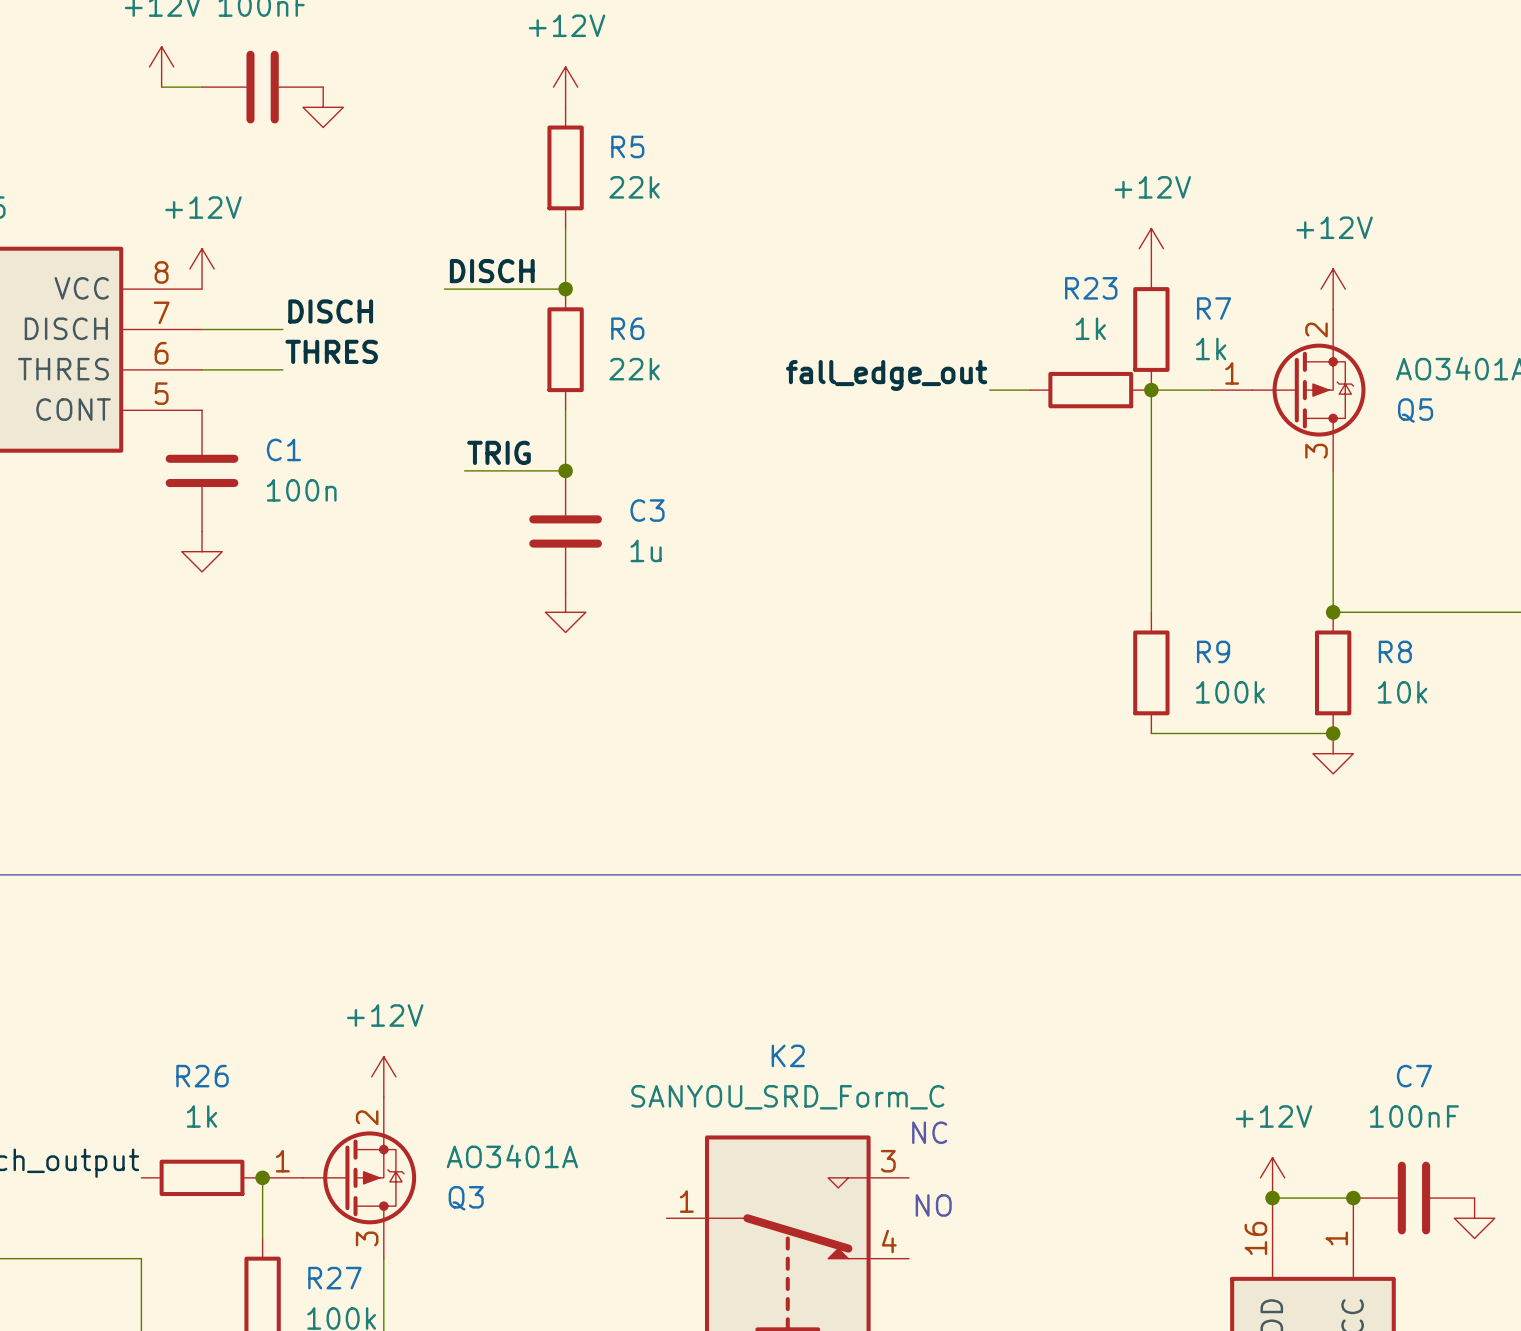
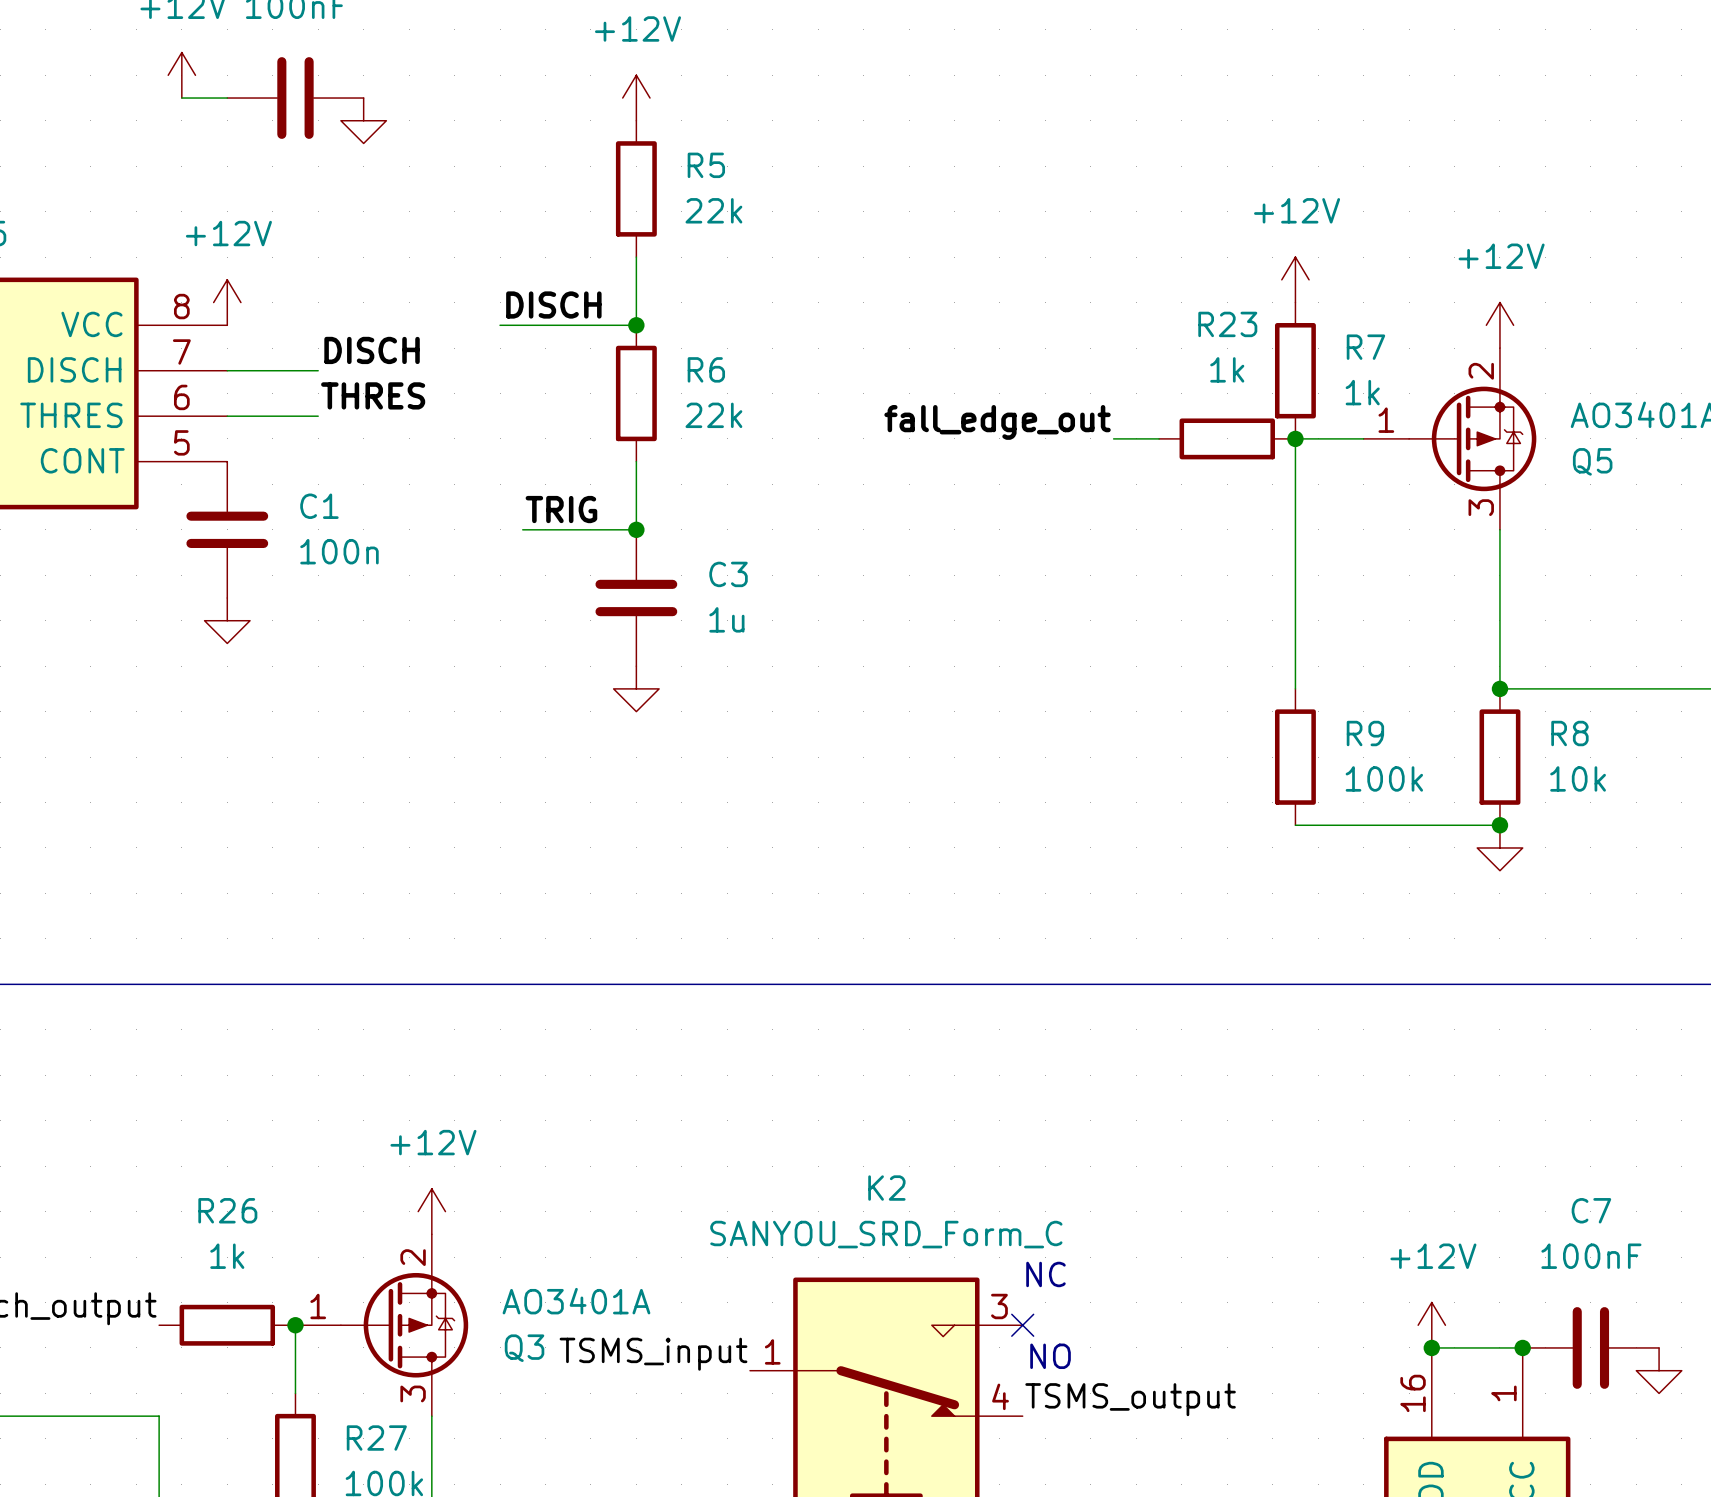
no-connect mark: none -> (1022, 1325)
label: none -> TSMS_input (653, 1354)
label: none -> TSMS_output (1130, 1399)

